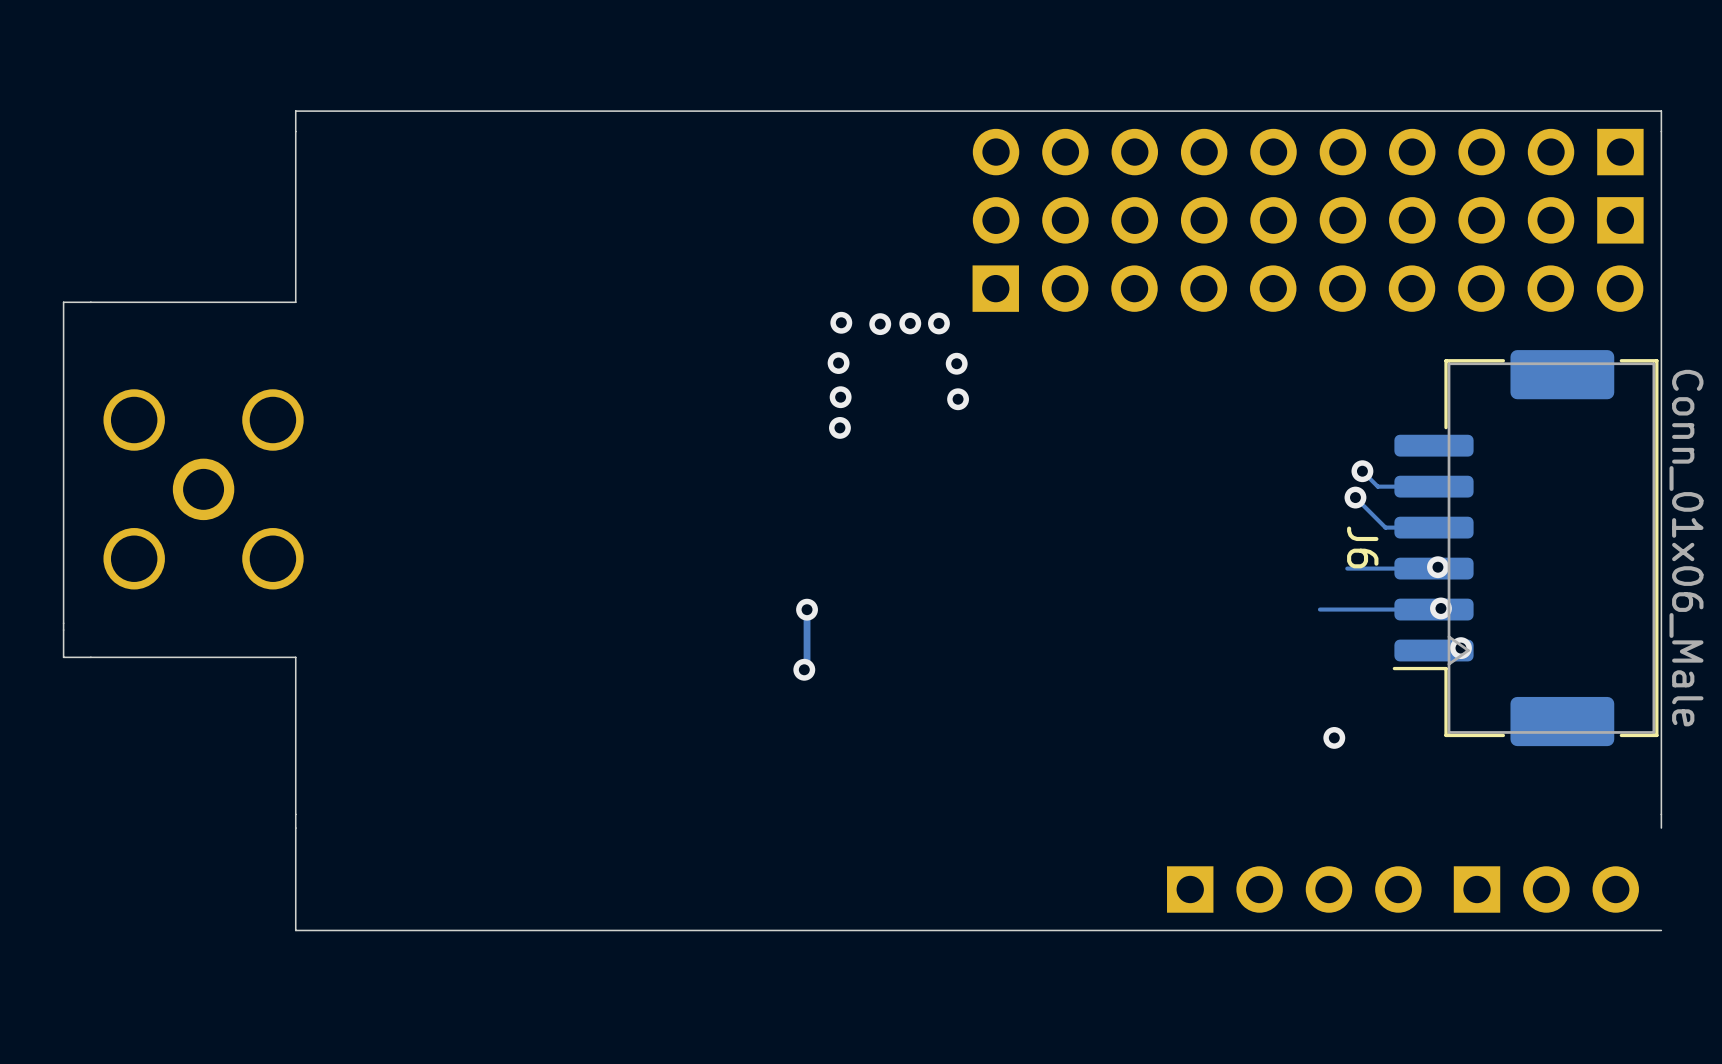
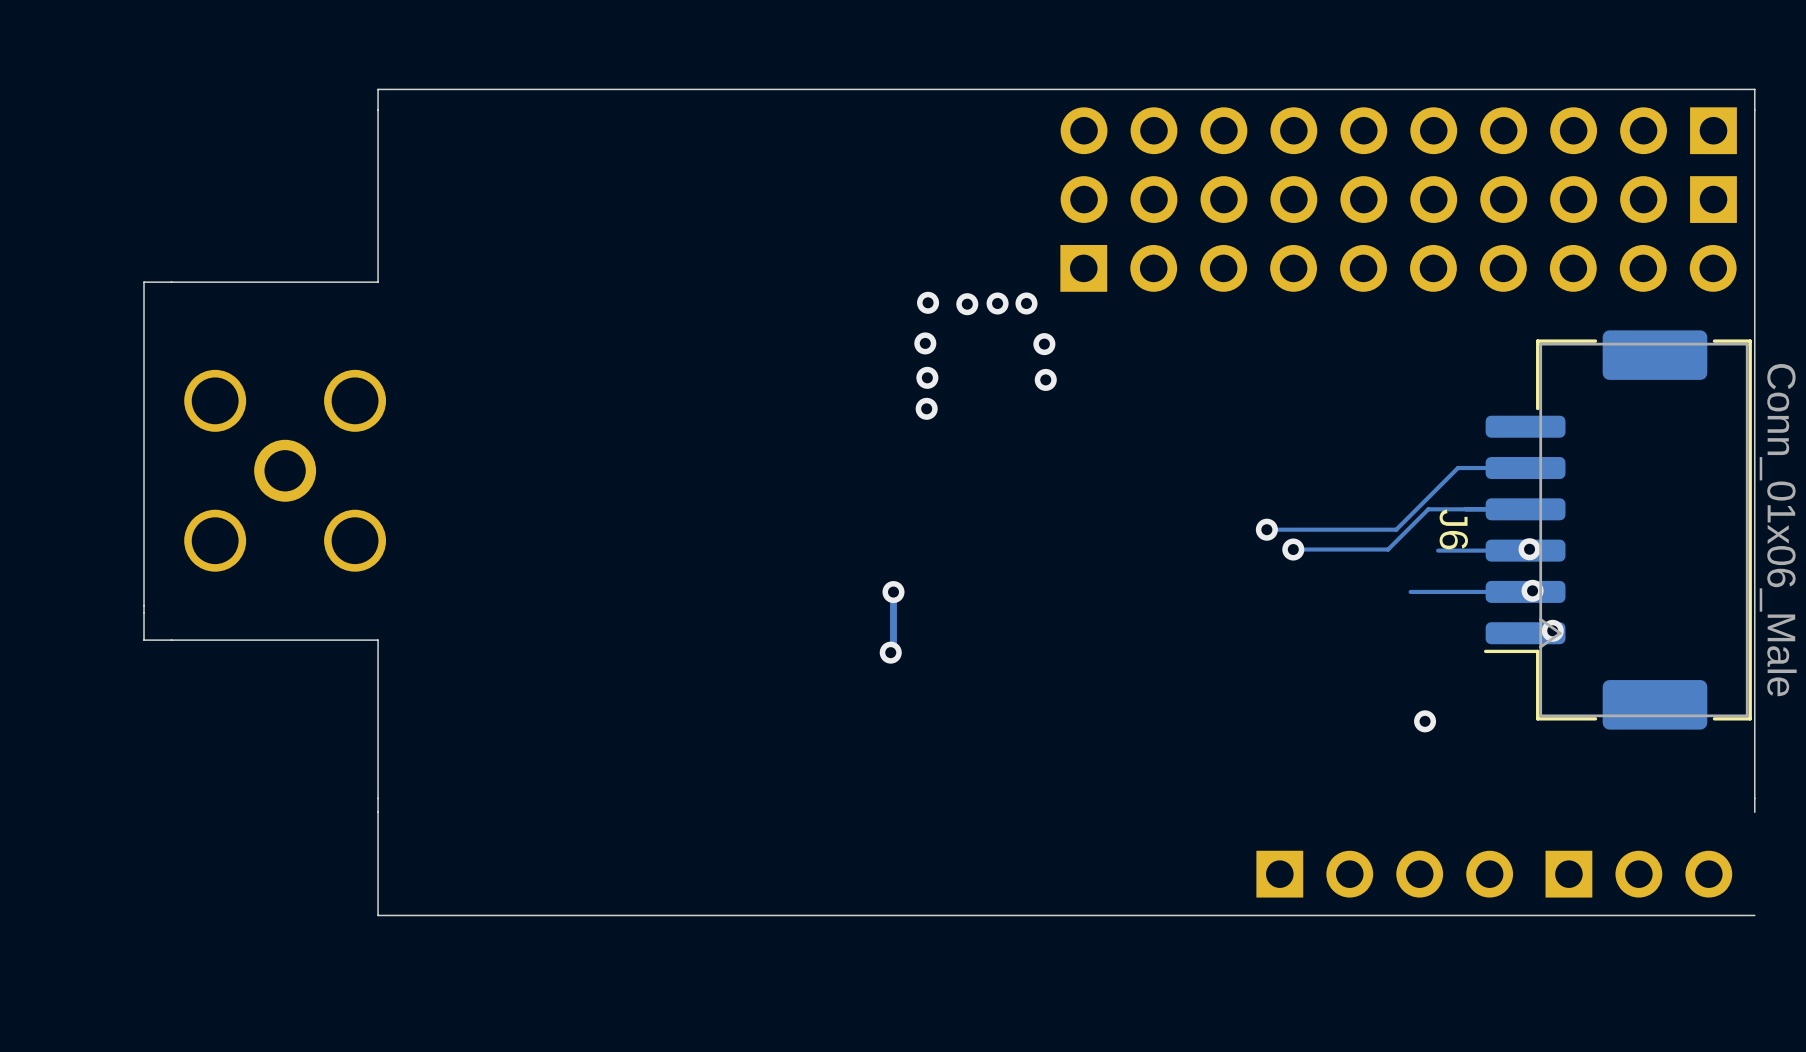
track: (1362, 471) (1377, 486) -> (1266, 529) (1396, 529) (1457, 468) (1468, 468)
via: (1362, 471) -> none
track: (1355, 497) (1385, 527) -> (1293, 549) (1388, 549) (1428, 509) (1476, 509)
via: (1355, 497) -> none
via: none -> (1266, 529)
via: none -> (1293, 549)

